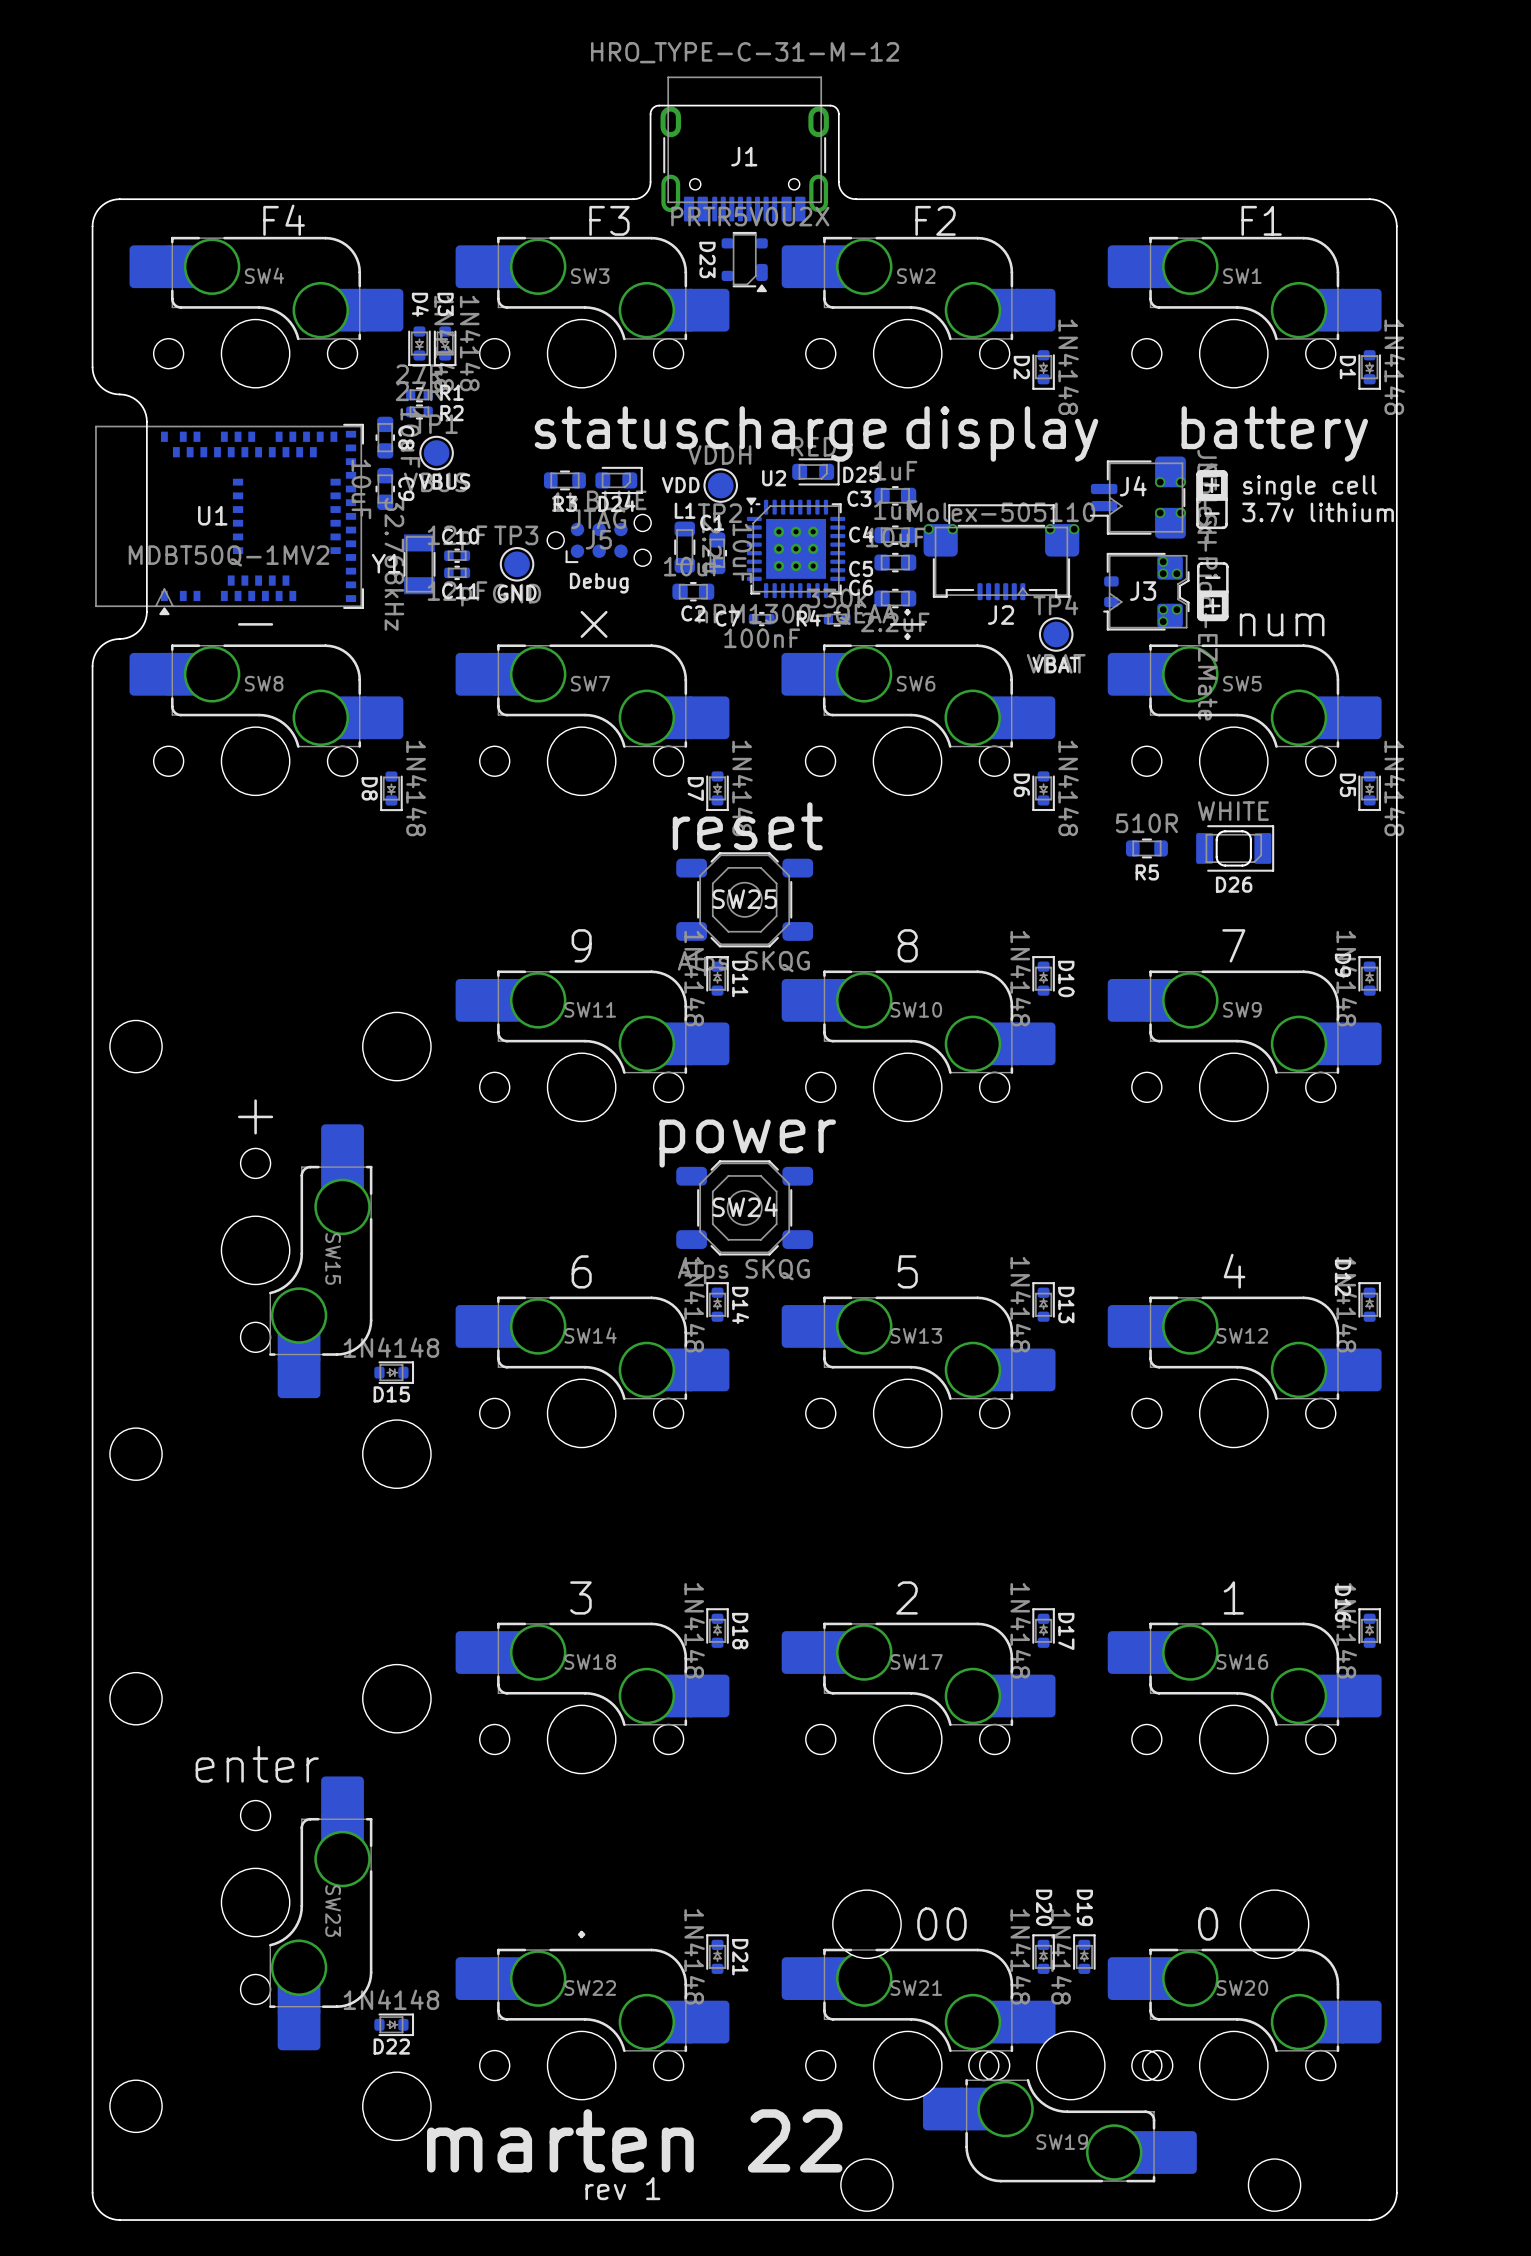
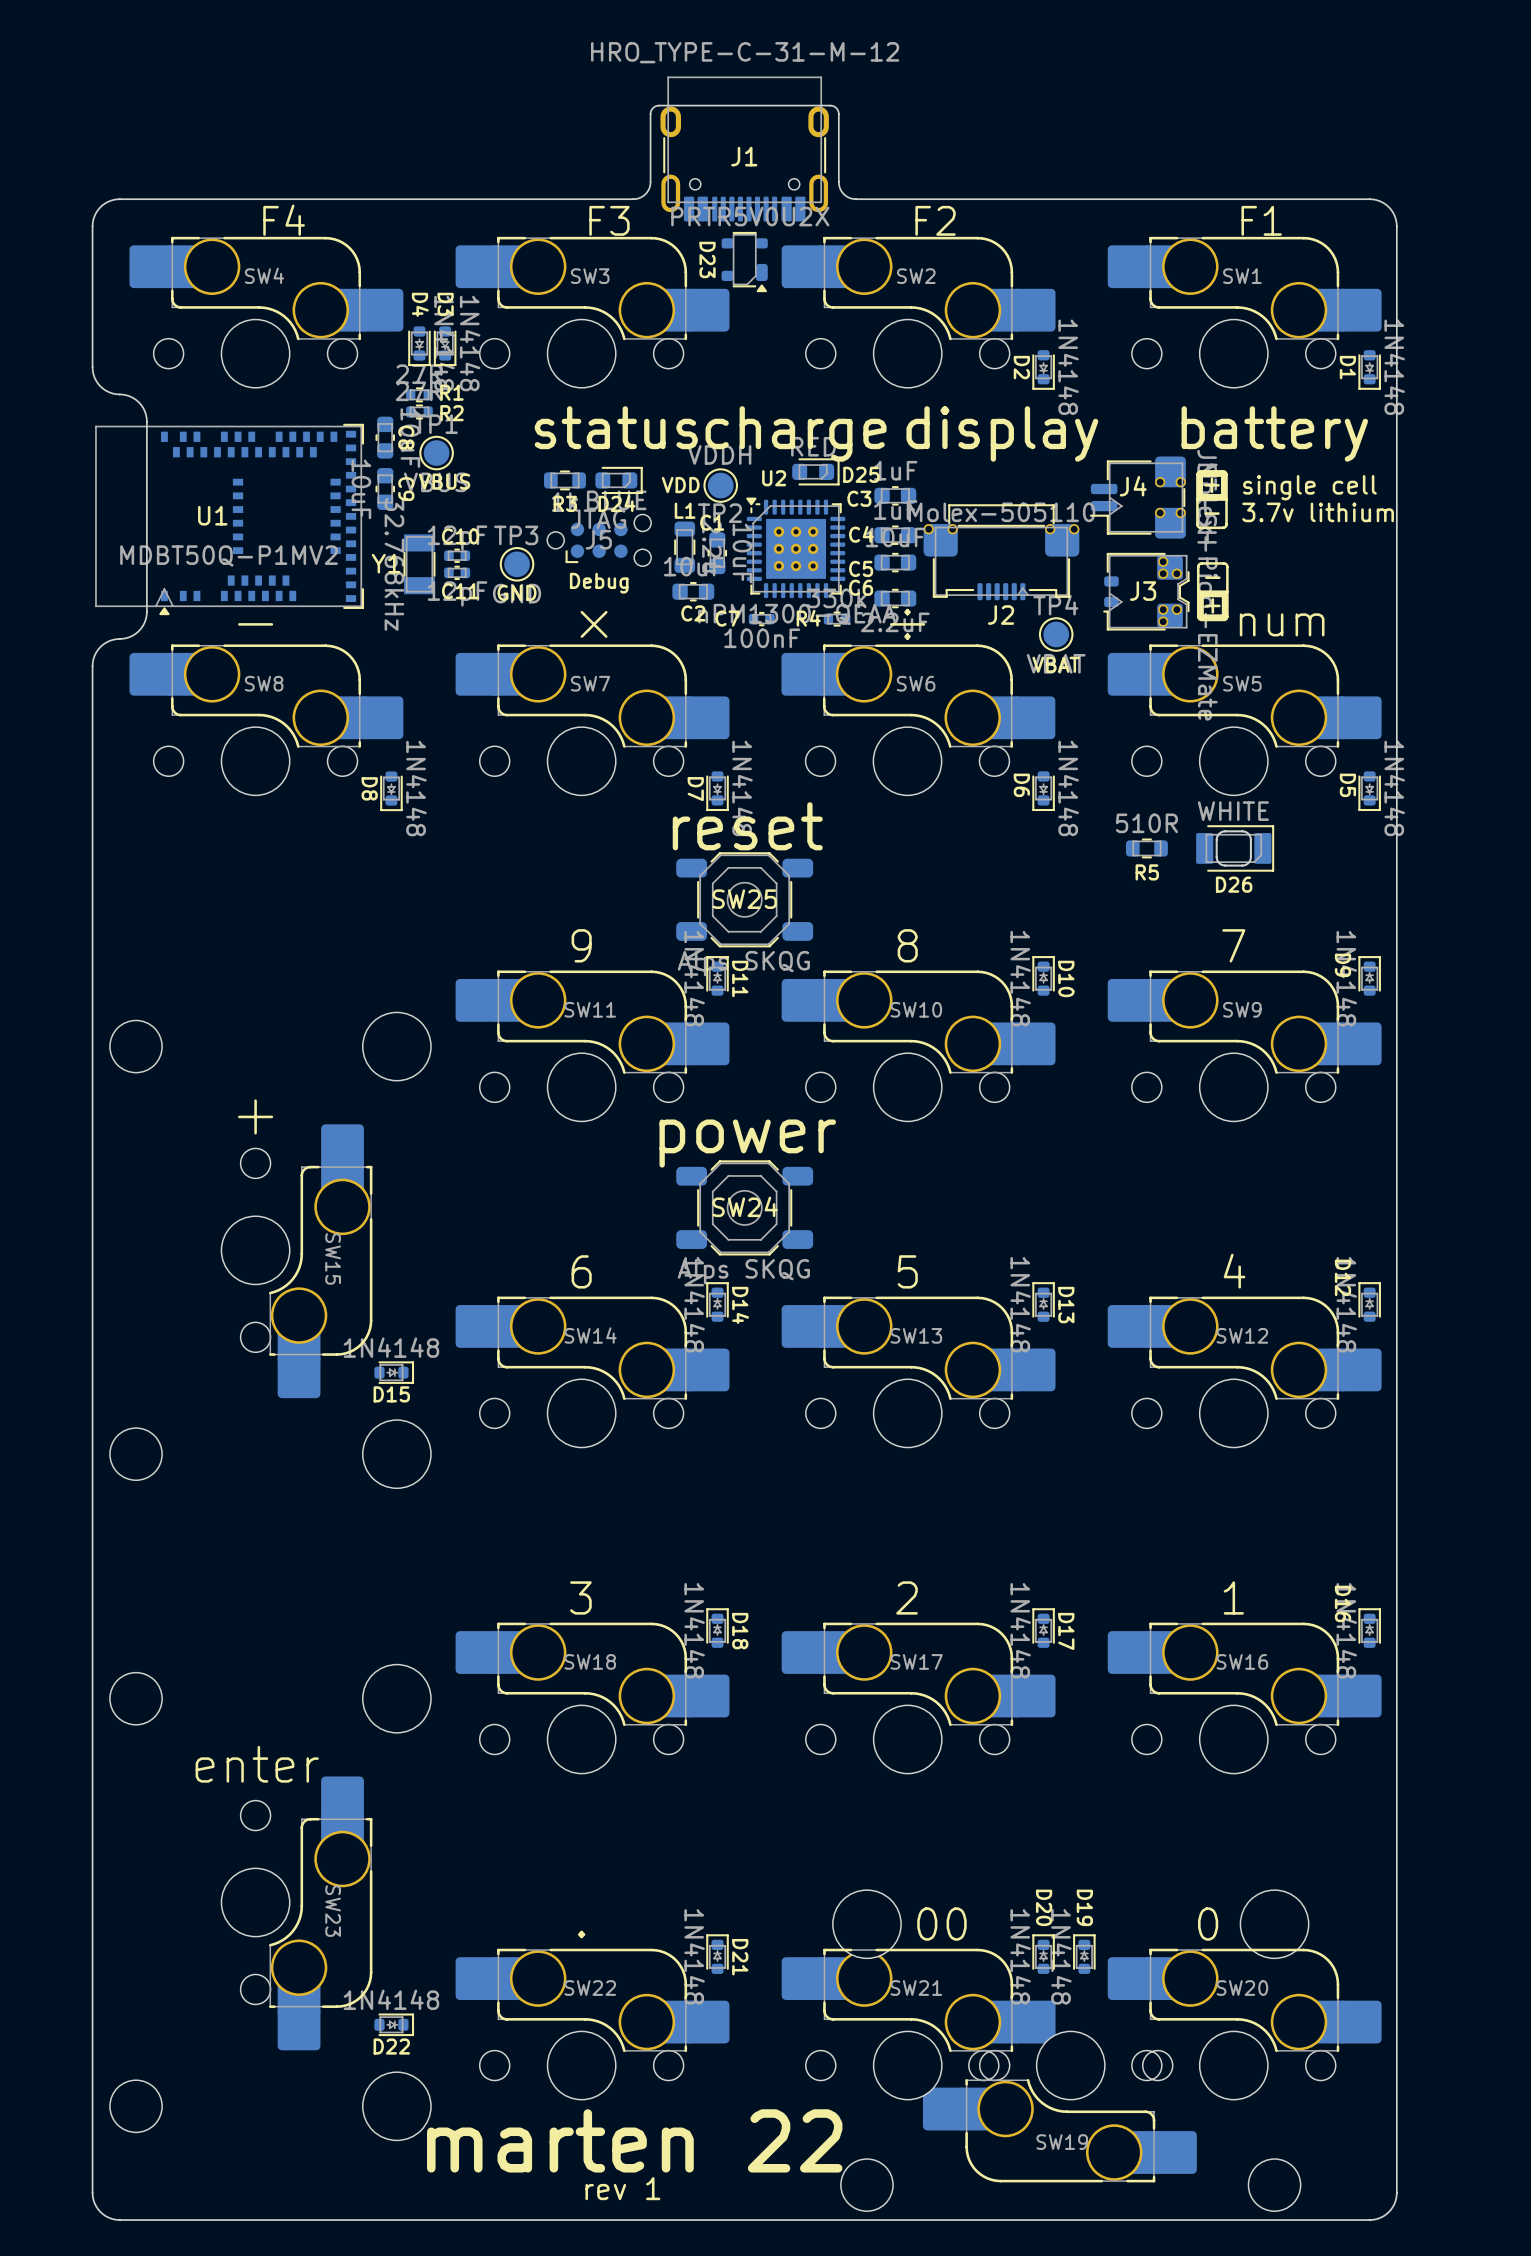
U1 value: MDBT50Q-1MV2 (229, 555) -> MDBT50Q-P1MV2 (229, 555)

